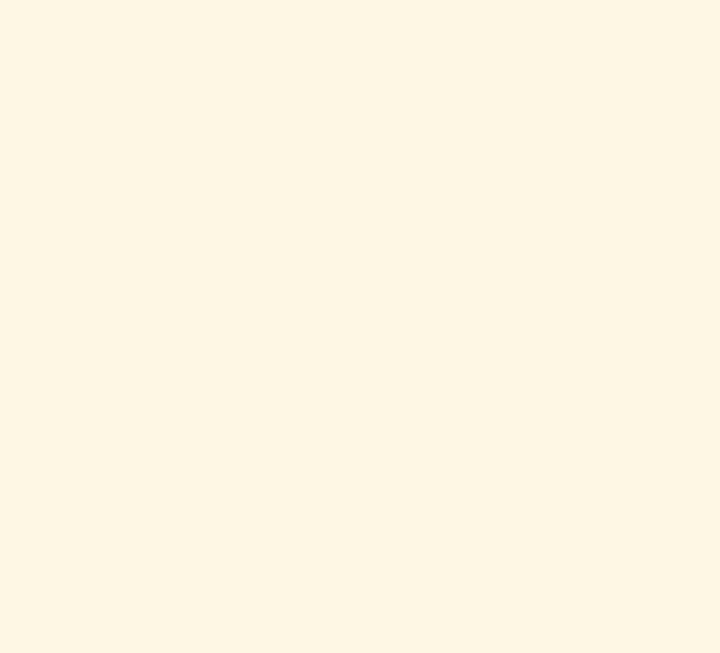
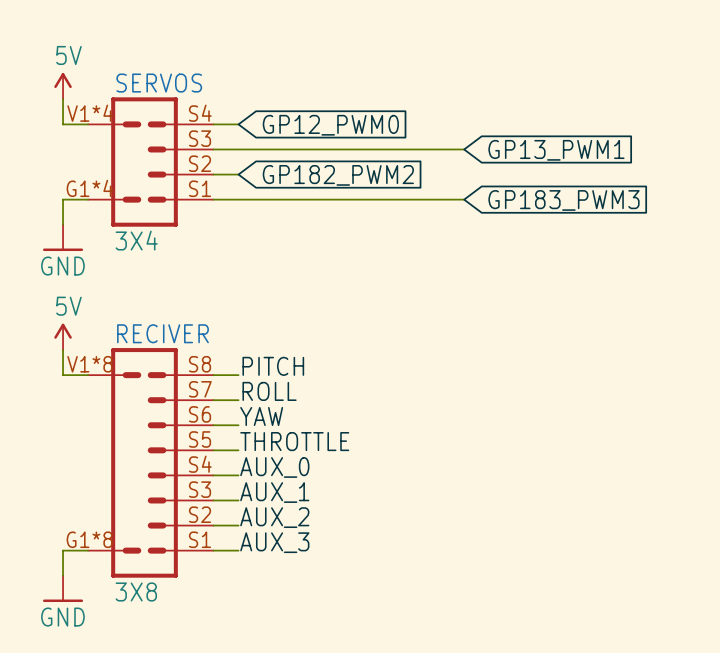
power symbol: none -> 5V (63, 86)
wire: none -> (63, 99) (63, 124) (88, 124)
wire: none -> (213, 124) (238, 124)
global label: none -> GP12_PWM0 (330, 125)
wire: none -> (213, 149) (464, 149)
global label: none -> GP13_PWM1 (556, 150)
SERVOS: none -> 3X4 (150, 162)
wire: none -> (213, 174) (238, 174)
global label: none -> GP182_PWM2 (338, 175)
wire: none -> (88, 199) (63, 199) (63, 224)
wire: none -> (213, 199) (464, 199)
global label: none -> GP183_PWM3 (564, 200)
power symbol: none -> GND (63, 237)
power symbol: none -> 5V (63, 336)
wire: none -> (63, 350) (63, 375) (88, 375)
label: none -> PITCH (273, 366)
wire: none -> (213, 375) (238, 375)
label: none -> ROLL (269, 391)
wire: none -> (213, 400) (238, 400)
label: none -> YAW (261, 416)
wire: none -> (213, 425) (238, 425)
label: none -> THROTTLE (294, 441)
wire: none -> (213, 450) (238, 450)
RECIVER: none -> 3X8 (150, 462)
label: none -> AUX_0 (274, 467)
wire: none -> (213, 475) (238, 475)
label: none -> AUX_1 (274, 492)
wire: none -> (213, 500) (238, 500)
label: none -> AUX_2 (274, 517)
wire: none -> (213, 525) (238, 525)
label: none -> AUX_3 (274, 542)
wire: none -> (88, 550) (63, 550) (63, 575)
wire: none -> (213, 550) (238, 550)
power symbol: none -> GND (63, 588)

